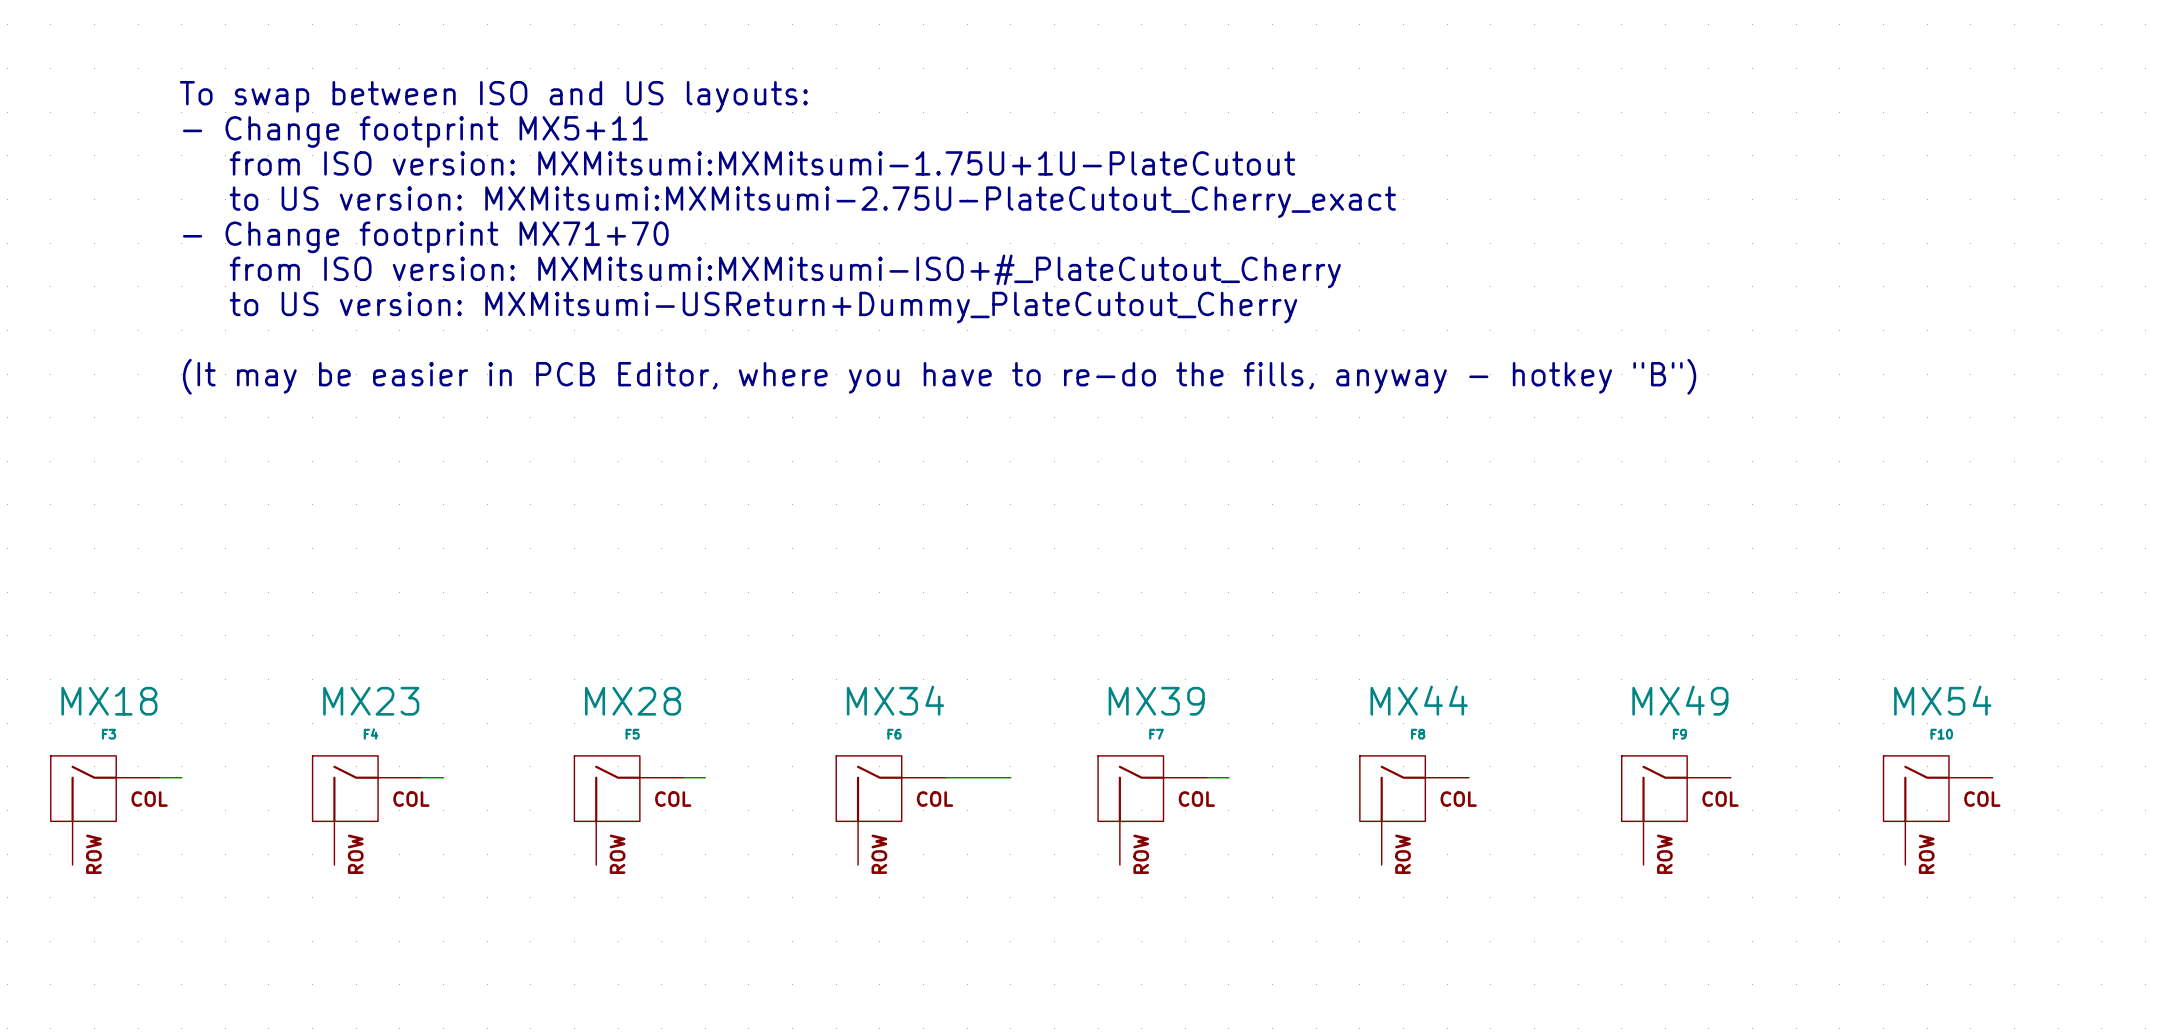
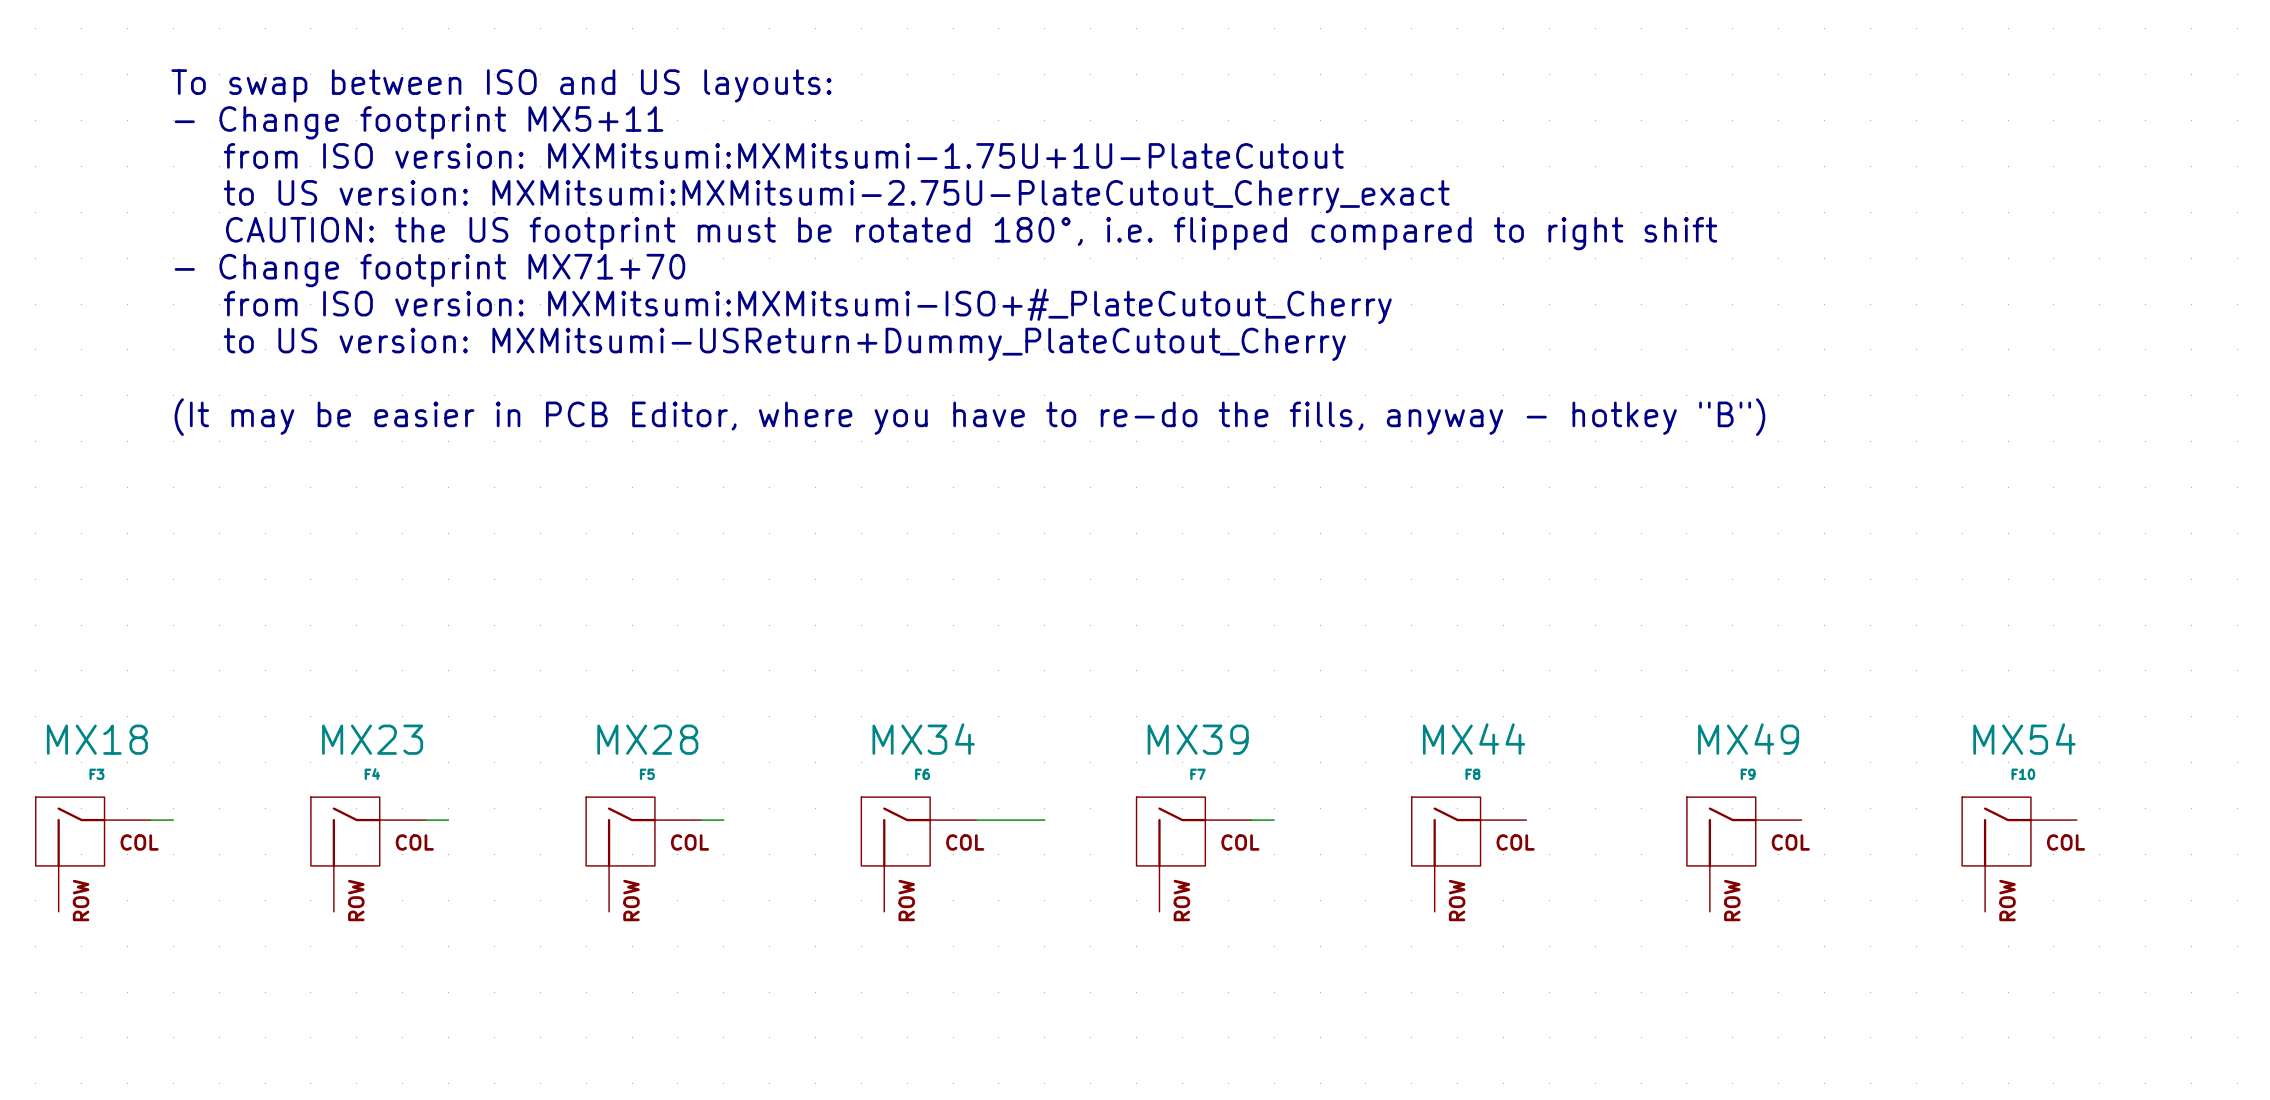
text position: To swap between ISO and US layouts: (493, 96) -> To swap between ISO and US layouts: (501, 85)
text position: - Change footprint MX5+11 (415, 131) -> - Change footprint MX5+11 (419, 122)
text position: from ISO version: MXMitsumi:MXMitsumi-1.75U+1U-PlateCutout (762, 163) -> from ISO version: MXMitsumi:MXMitsumi-1.75U+1U-PlateCutout (783, 155)
text position: to US version: MXMitsumi:MXMitsumi-2.75U-PlateCutout_Cherry_exact (812, 202) -> to US version: MXMitsumi:MXMitsumi-2.75U-PlateCutout_Cherry_exact (836, 196)
text: none -> CAUTION: the US footprint must be rotated 180°, i.e. flipped compared to right shift (971, 233)
text position: - Change footprint MX71+70 (425, 237) -> - Change footprint MX71+70 (429, 270)
text position: from ISO version: MXMitsumi:MXMitsumi-ISO+#_PlateCutout_Cherry (785, 271) -> from ISO version: MXMitsumi:MXMitsumi-ISO+#_PlateCutout_Cherry (807, 306)
text position: to US version: MXMitsumi-USReturn+Dummy_PlateCutout_Cherry (763, 307) -> to US version: MXMitsumi-USReturn+Dummy_PlateCutout_Cherry (784, 344)
text position: (It may be easier in PCB Editor, where you have to re-do the fills, anyway - hotkey "B") (939, 376) -> (It may be easier in PCB Editor, where you have to re-do the fills, anyway - hotkey "B") (969, 417)

